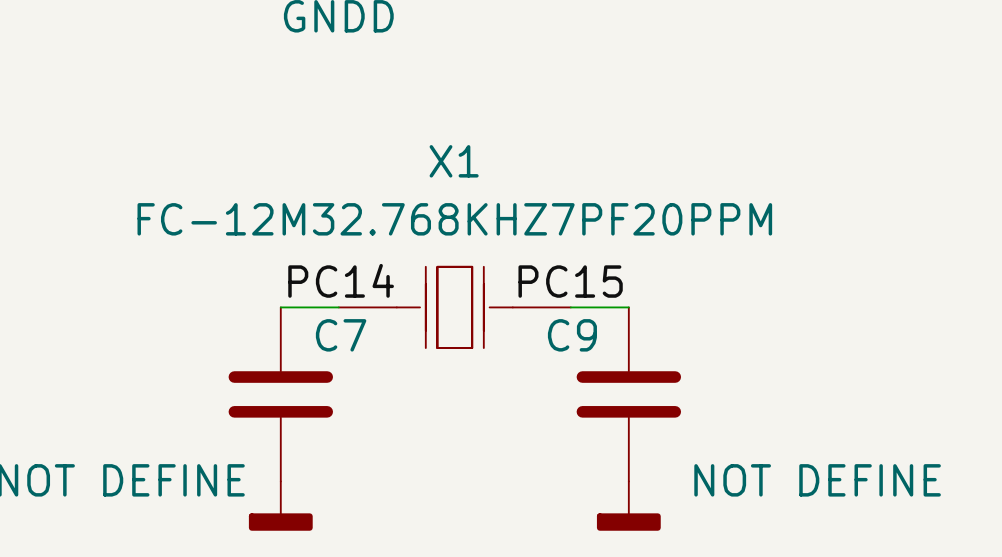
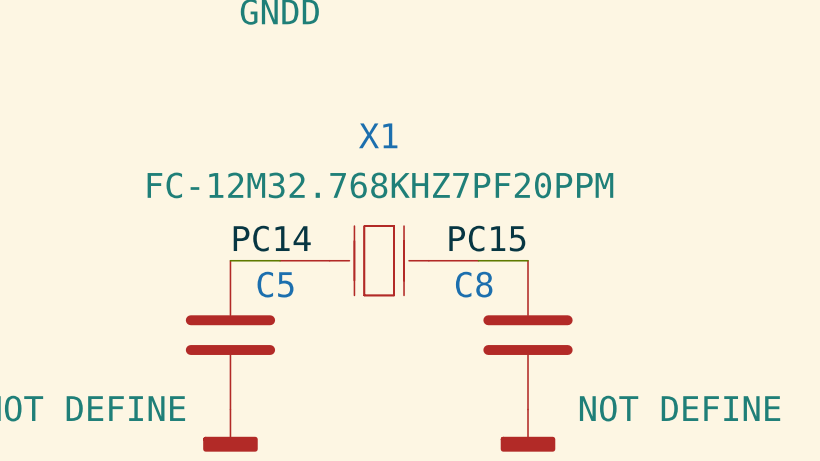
C7 name: C7 (341, 335) -> C5 (275, 284)
C9 name: C9 (572, 335) -> C8 (474, 284)

